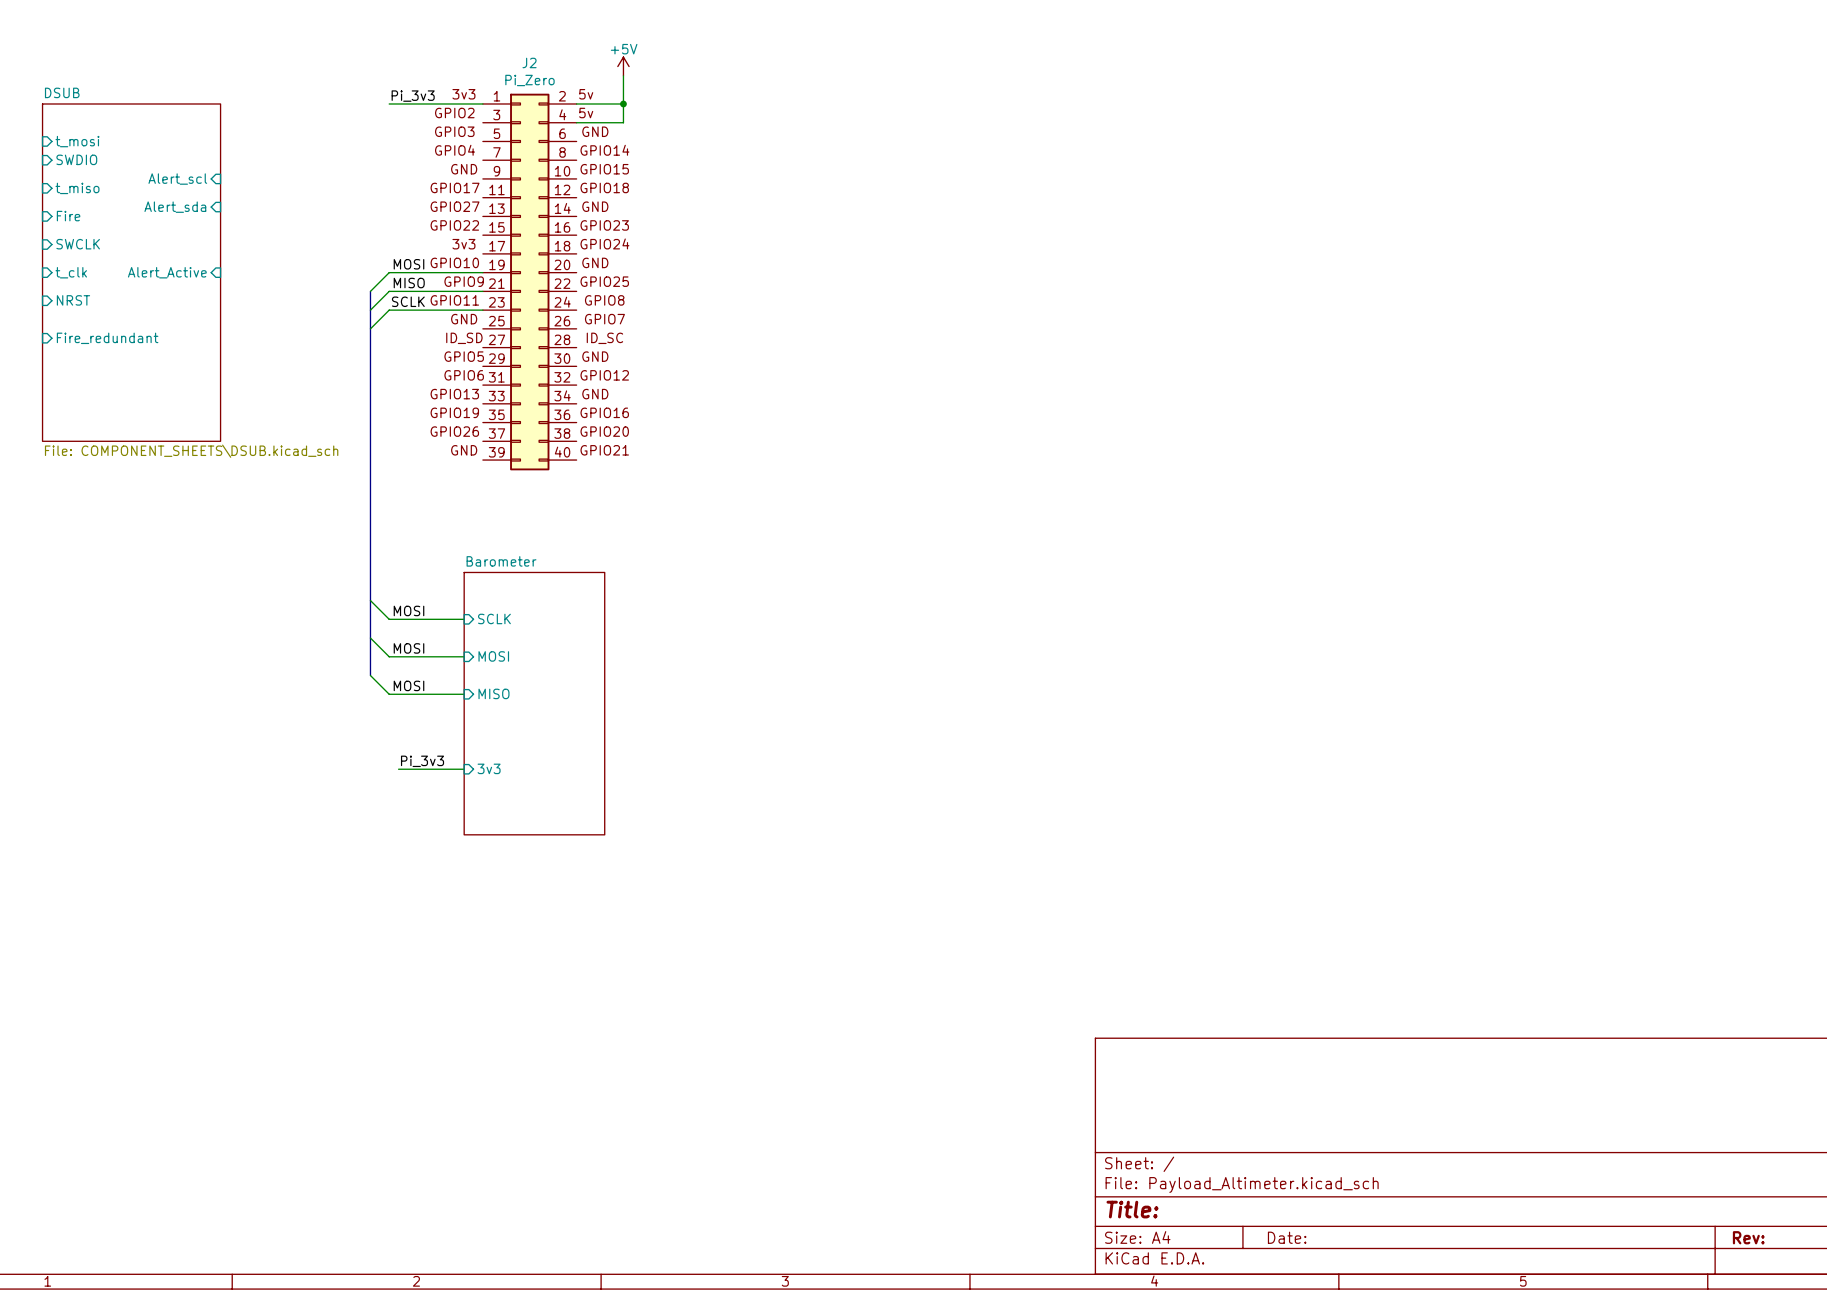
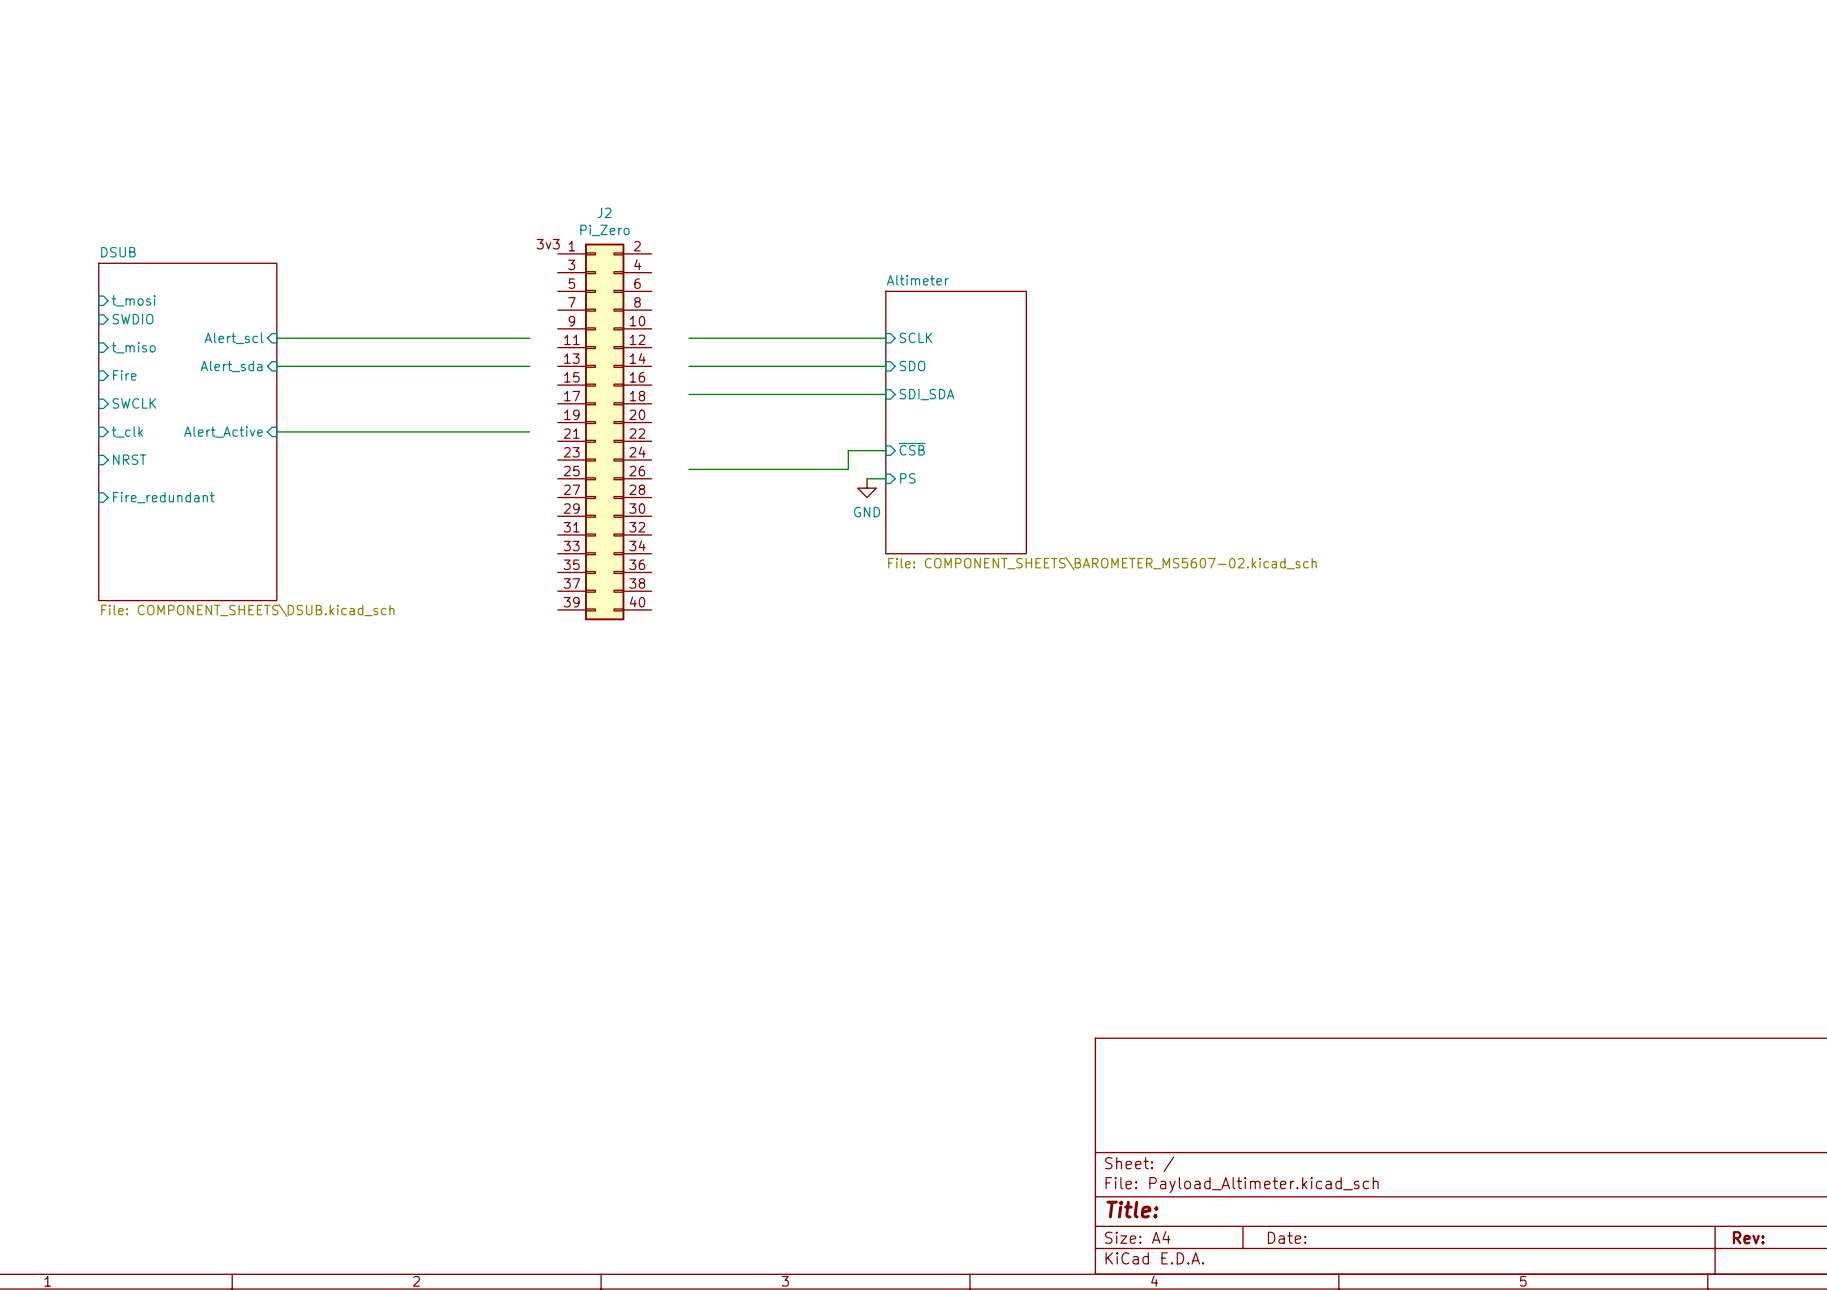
power symbol: +5V (623, 66) -> none
wire: (623, 75) (623, 122) (576, 122) -> none
J2 symbol: [482, 93, 577, 471] -> [557, 243, 652, 621]
label: Pi_3v3 (413, 96) -> none
wire: (389, 103) (482, 103) -> none
wire: (576, 103) (623, 103) -> none
junction: (623, 103) -> none
sheet pin position: t_mosi (77, 141) -> t_mosi (133, 300)
sheet pin position: SWDIO (76, 159) -> SWDIO (133, 319)
sheet pin position: Alert_scl (177, 179) -> Alert_scl (234, 338)
sheet pin position: t_miso (77, 188) -> t_miso (133, 347)
sheet pin position: Alert_sda (175, 207) -> Alert_sda (231, 366)
sheet pin position: Fire (68, 216) -> Fire (124, 375)
sheet pin position: SWCLK (78, 244) -> SWCLK (134, 403)
label: MOSI (409, 264) -> none
sheet pin position: t_clk (71, 272) -> t_clk (127, 432)
sheet DSUB position: (131, 272) -> (187, 431)
sheet pin position: Alert_Active (167, 272) -> Alert_Active (223, 432)
wire: (482, 272) (389, 272) (370, 291) -> none
label: MISO (409, 283) -> none
bus: (370, 291) (370, 675) -> none
wire: (482, 291) (389, 291) (370, 310) -> none
sheet pin position: NRST (73, 300) -> NRST (129, 459)
label: SCLK (408, 301) -> none
wire: (482, 310) (389, 310) (370, 328) -> none
sheet pin: none -> SCLK (916, 337)
sheet pin position: Fire_redundant (107, 338) -> Fire_redundant (163, 497)
wire: none -> (276, 338) (529, 338)
wire: none -> (689, 338) (885, 338)
sheet pin: none -> SDO (912, 365)
wire: none -> (276, 366) (529, 366)
wire: none -> (689, 366) (885, 366)
wire: none -> (689, 394) (885, 394)
sheet pin: none -> SDI_SDA (926, 394)
sheet Altimeter: none -> File: COMPONENT_SHEETS\BAROMETER_MS5607-02.kicad_sch (956, 422)
wire: none -> (276, 431) (529, 431)
sheet pin: none -> ~{CSB} (912, 449)
wire: none -> (885, 450) (848, 450) (848, 469) (689, 469)
wire: none -> (867, 478) (885, 478)
sheet pin: none -> PS (907, 478)
power symbol: none -> GND (867, 488)
wire: (370, 600) (389, 619) (464, 619) -> none
label: MOSI (409, 610) -> none
sheet pin: SCLK (494, 618) -> none
wire: (370, 638) (389, 656) (464, 656) -> none
label: MOSI (409, 648) -> none
sheet pin: MOSI (493, 656) -> none
wire: (370, 675) (389, 694) (464, 694) -> none
label: MOSI (409, 685) -> none
sheet pin: MISO (493, 693) -> none
sheet Barometer: (534, 703) -> none
label: Pi_3v3 (422, 761) -> none
sheet pin: 3v3 (489, 768) -> none
wire: (398, 769) (464, 769) -> none

